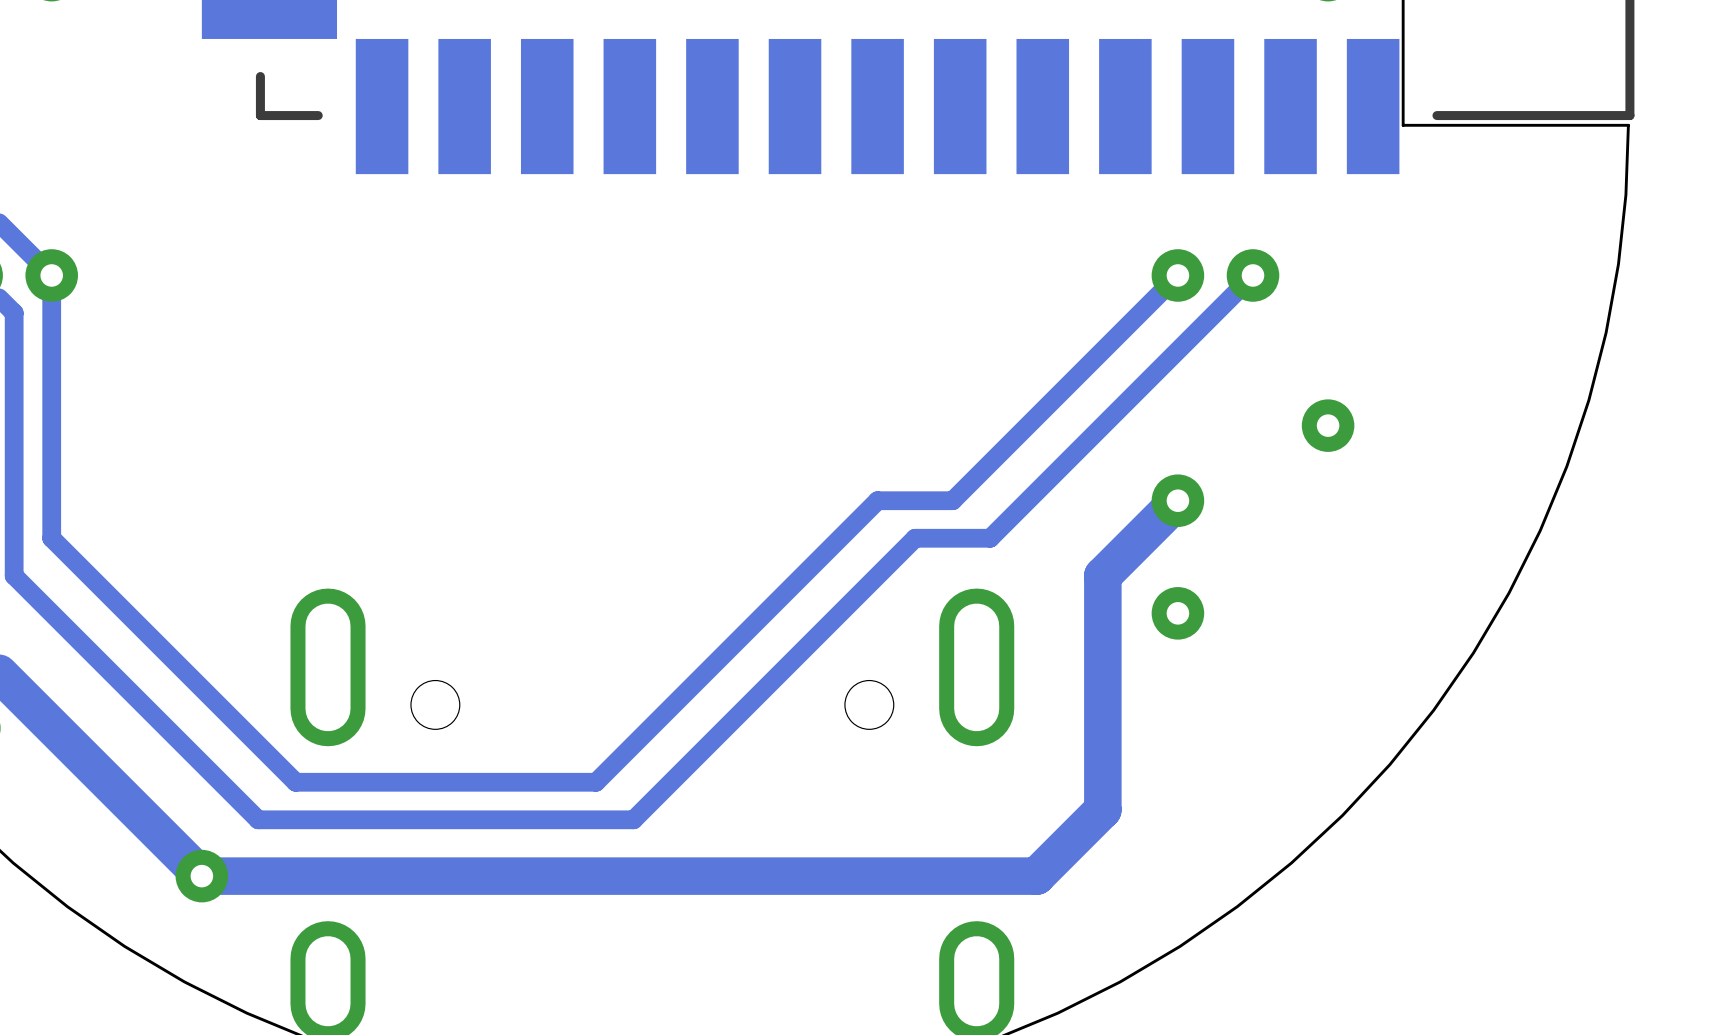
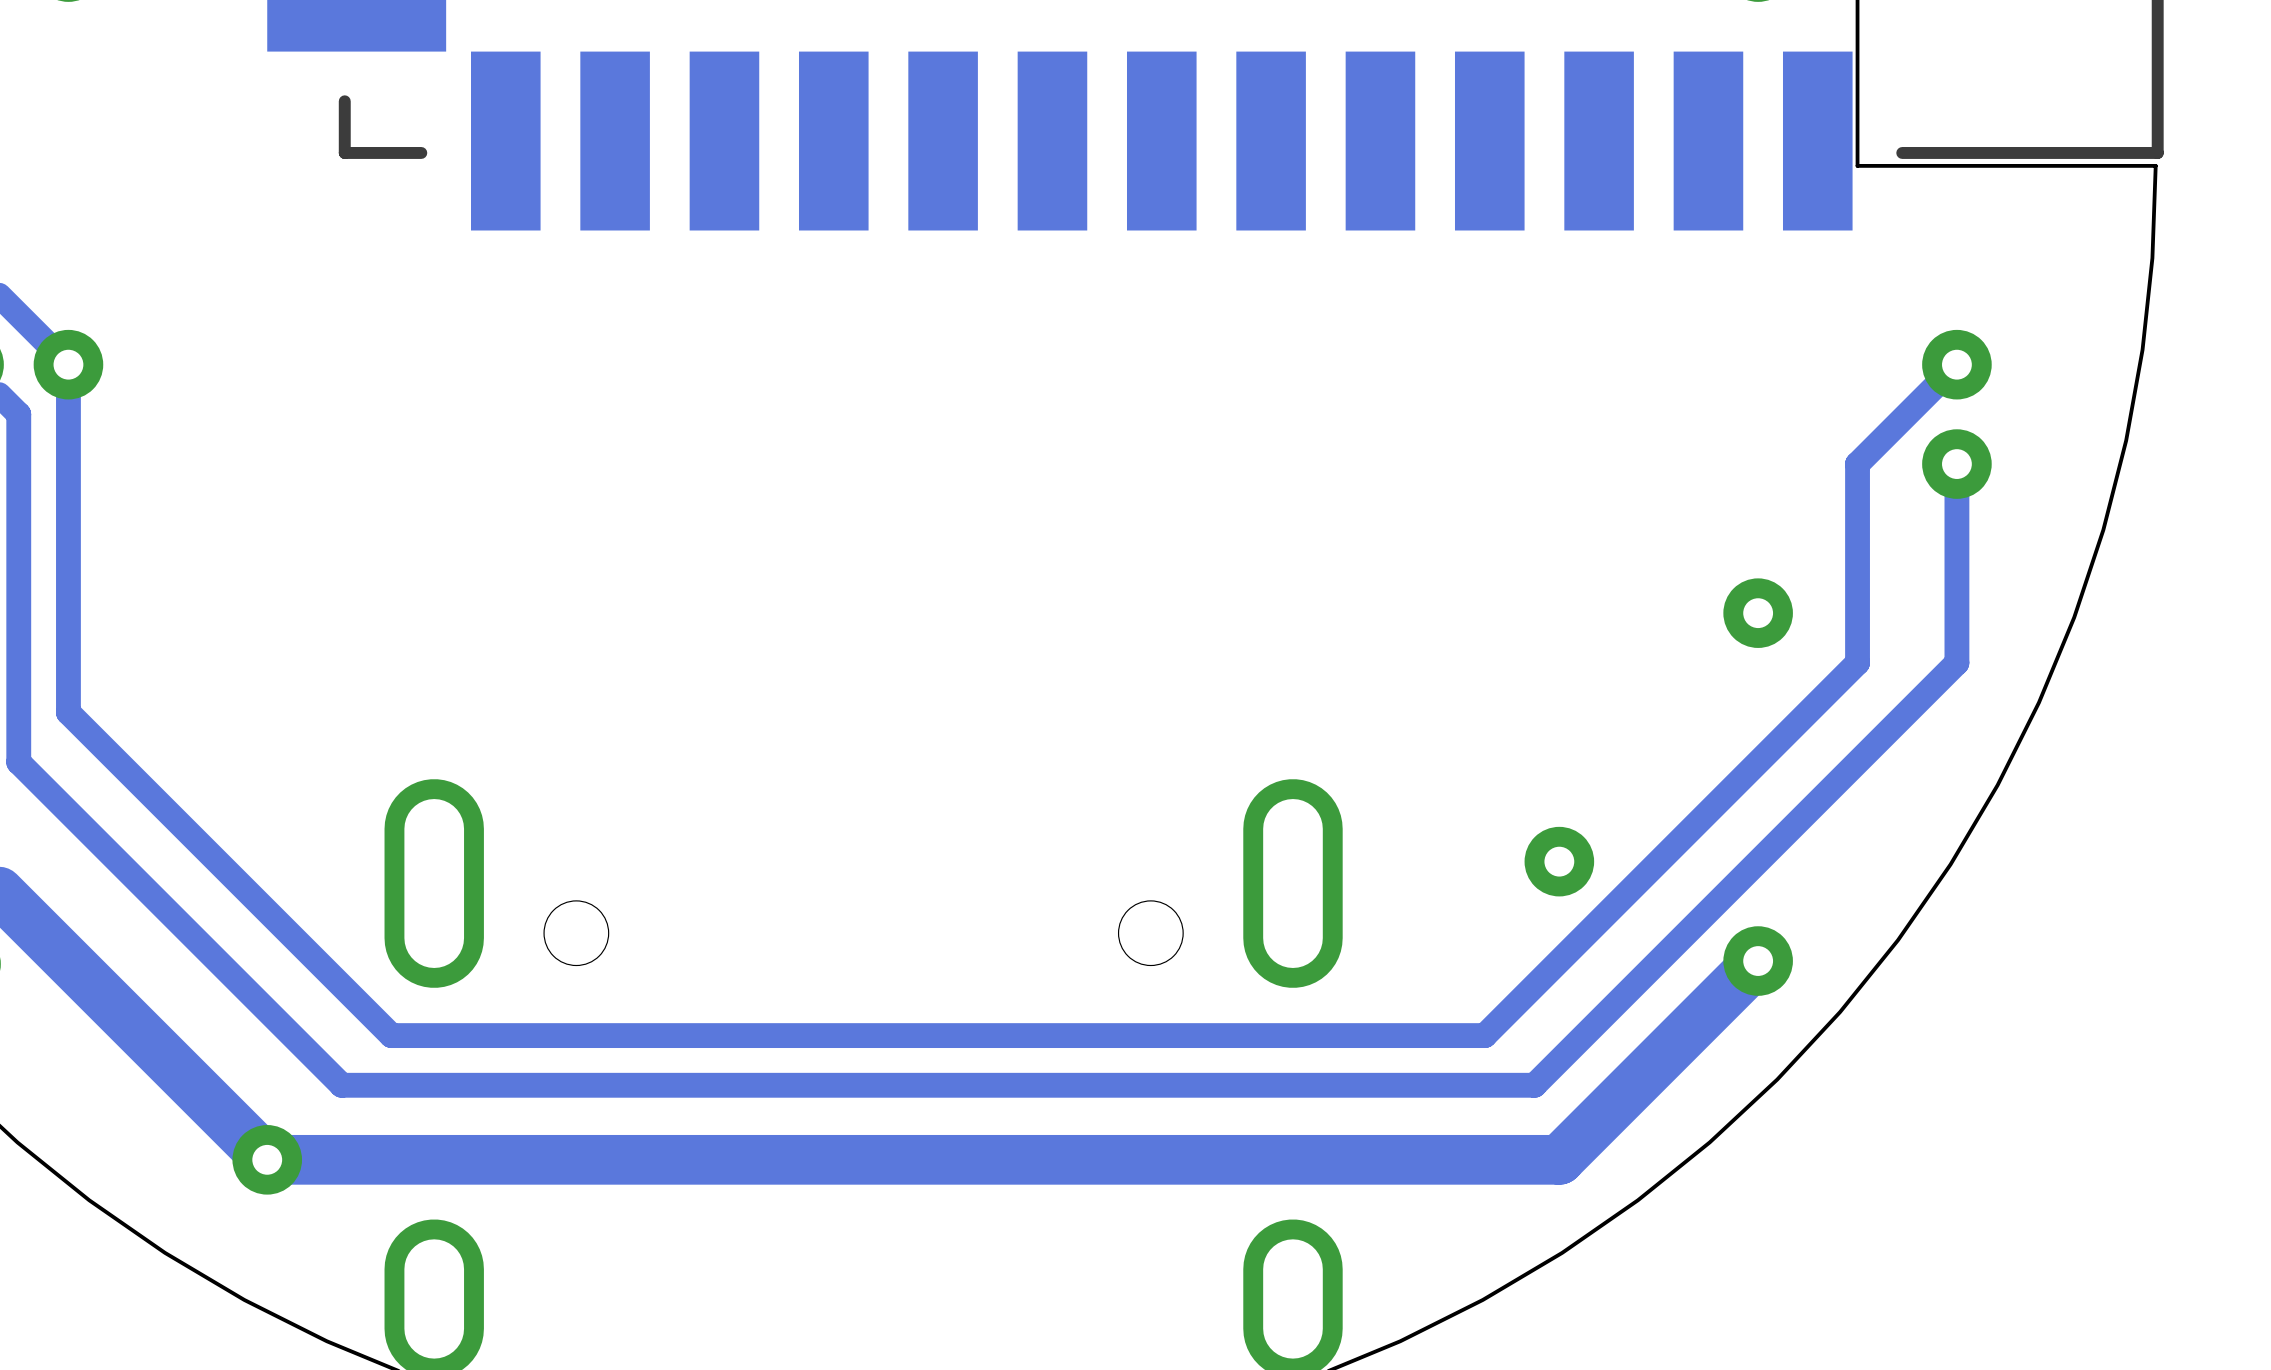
track: (1177, 275) (952, 500) (877, 500) (596, 782) -> (1956, 364) (1857, 464) (1857, 662) (1484, 1035) (789, 1035)
via: (1177, 275) -> none
track: (1253, 275) (990, 538) (915, 538) (633, 819) -> (1956, 464) (1956, 662) (1534, 1085) (838, 1085)
via: (1253, 275) -> none
via: none -> (1956, 364)
via: none -> (1956, 464)
via position: (1328, 425) -> (1758, 613)
track: (1177, 500) (1102, 575) (1102, 809) (1036, 876) -> (1758, 961) (1559, 1159) (1372, 1159)
via: (1177, 500) -> none
via position: (1177, 613) -> (1559, 861)
via: none -> (1758, 961)

